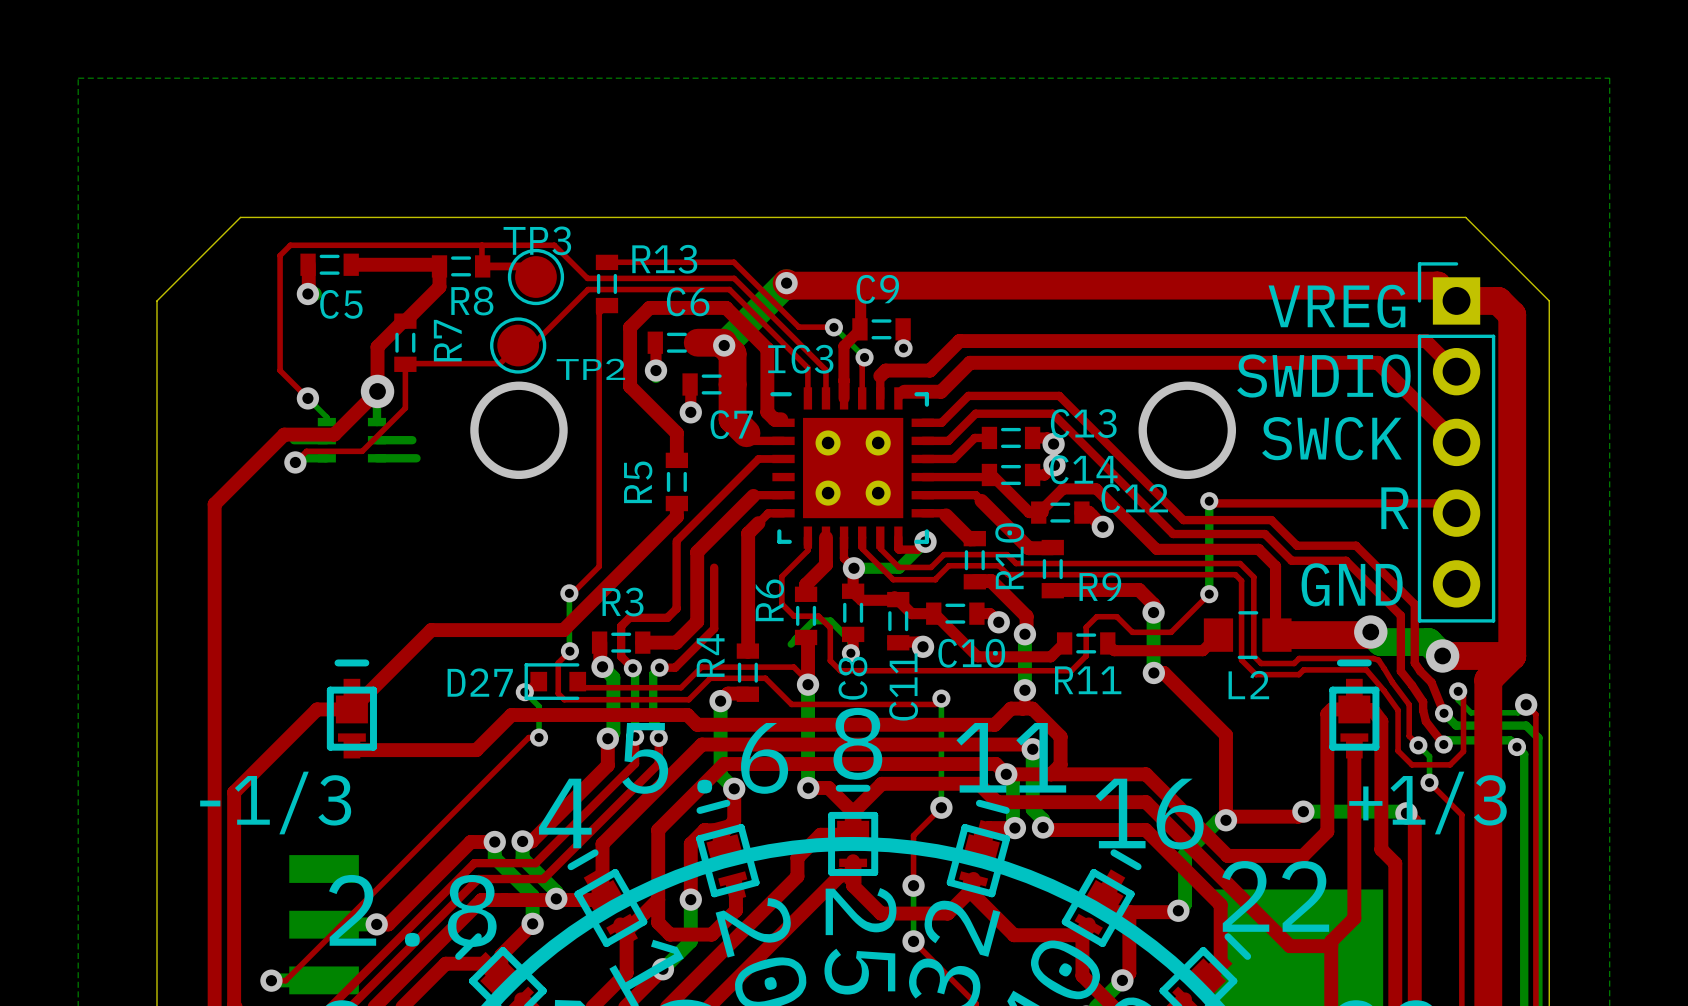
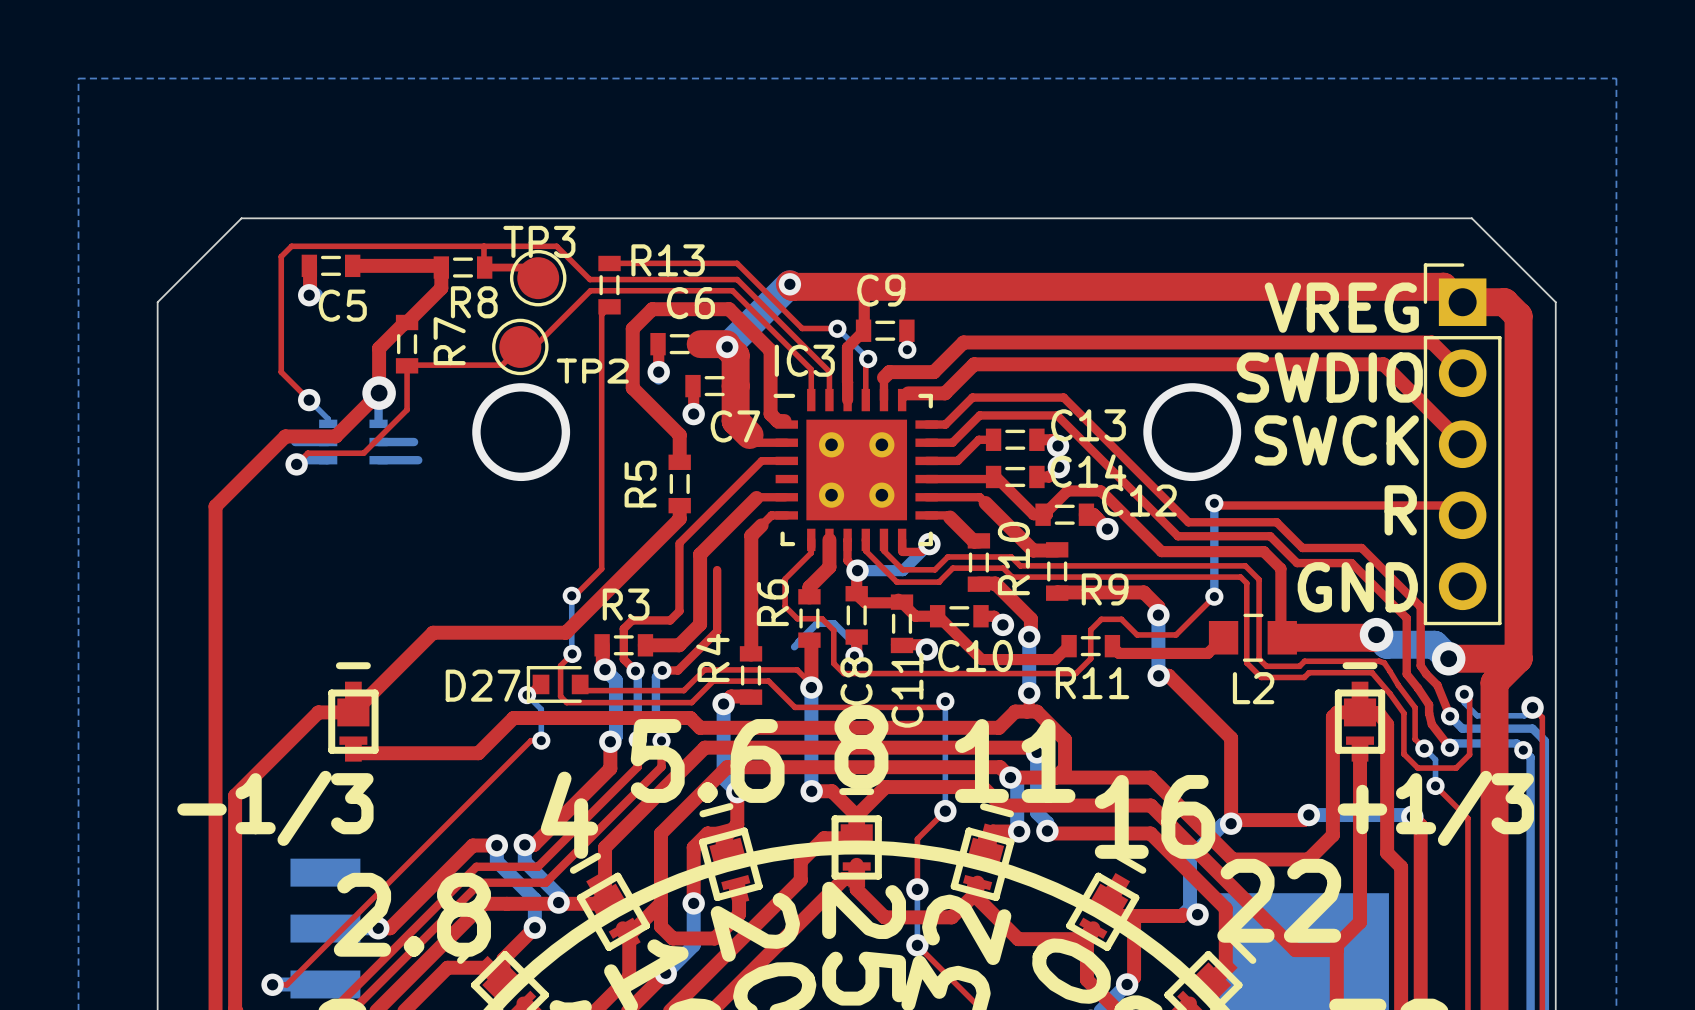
via position: (1178, 910) -> (1197, 914)

